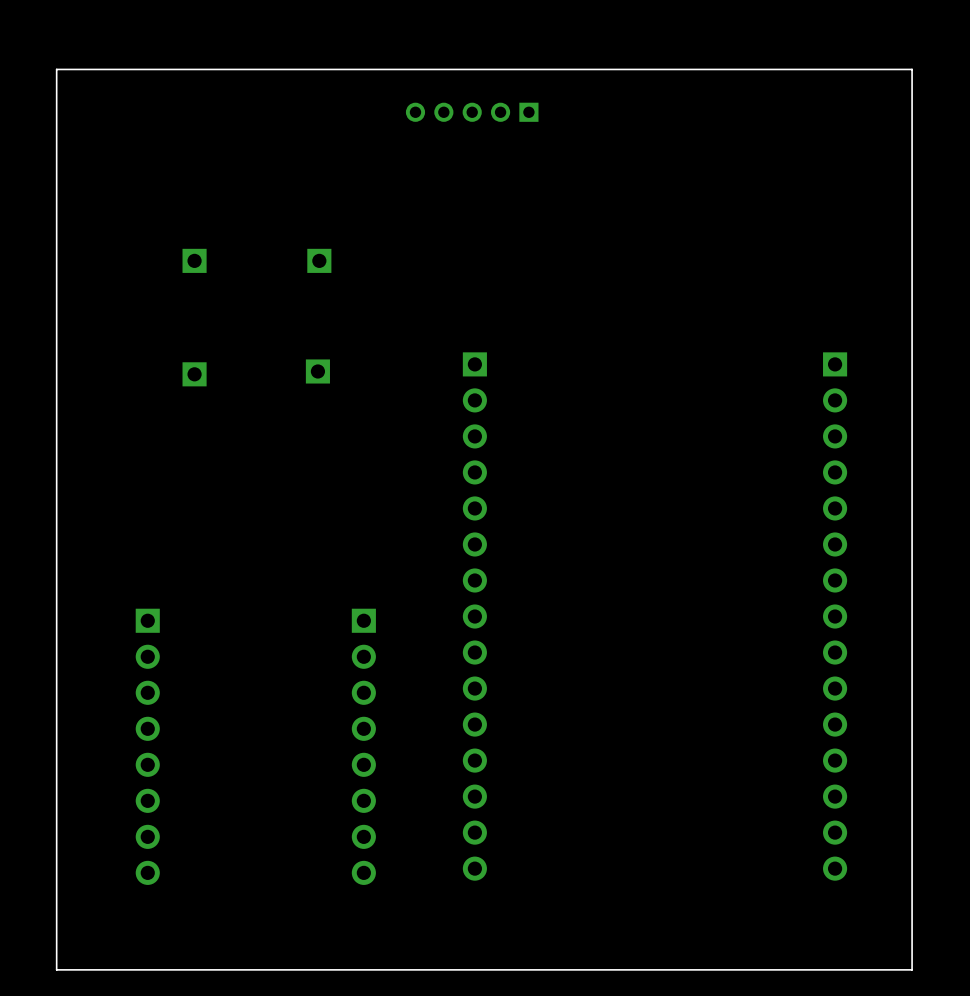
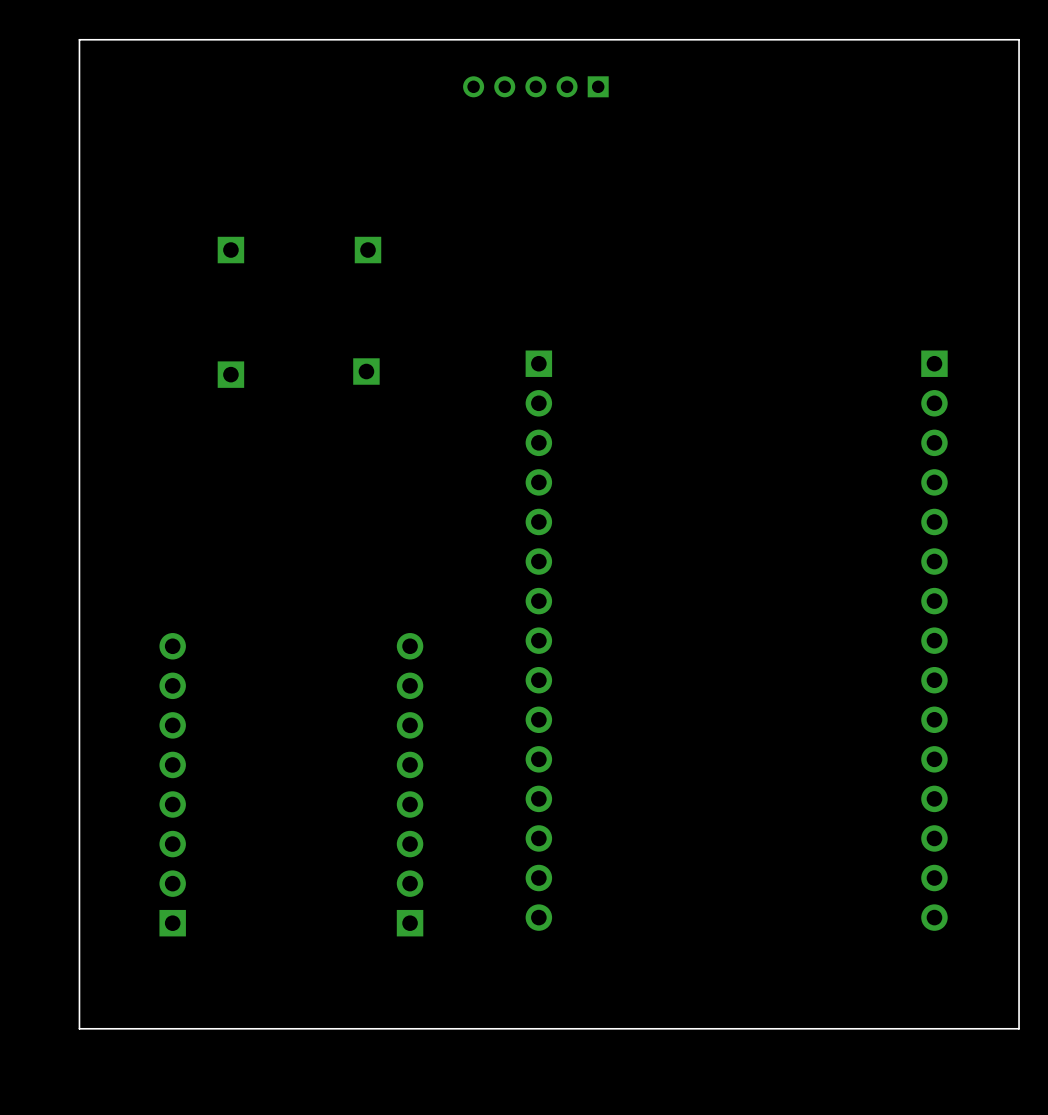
part rotation: 0° (147, 746) -> 180° (172, 784)
part rotation: 0° (363, 746) -> 180° (410, 784)

